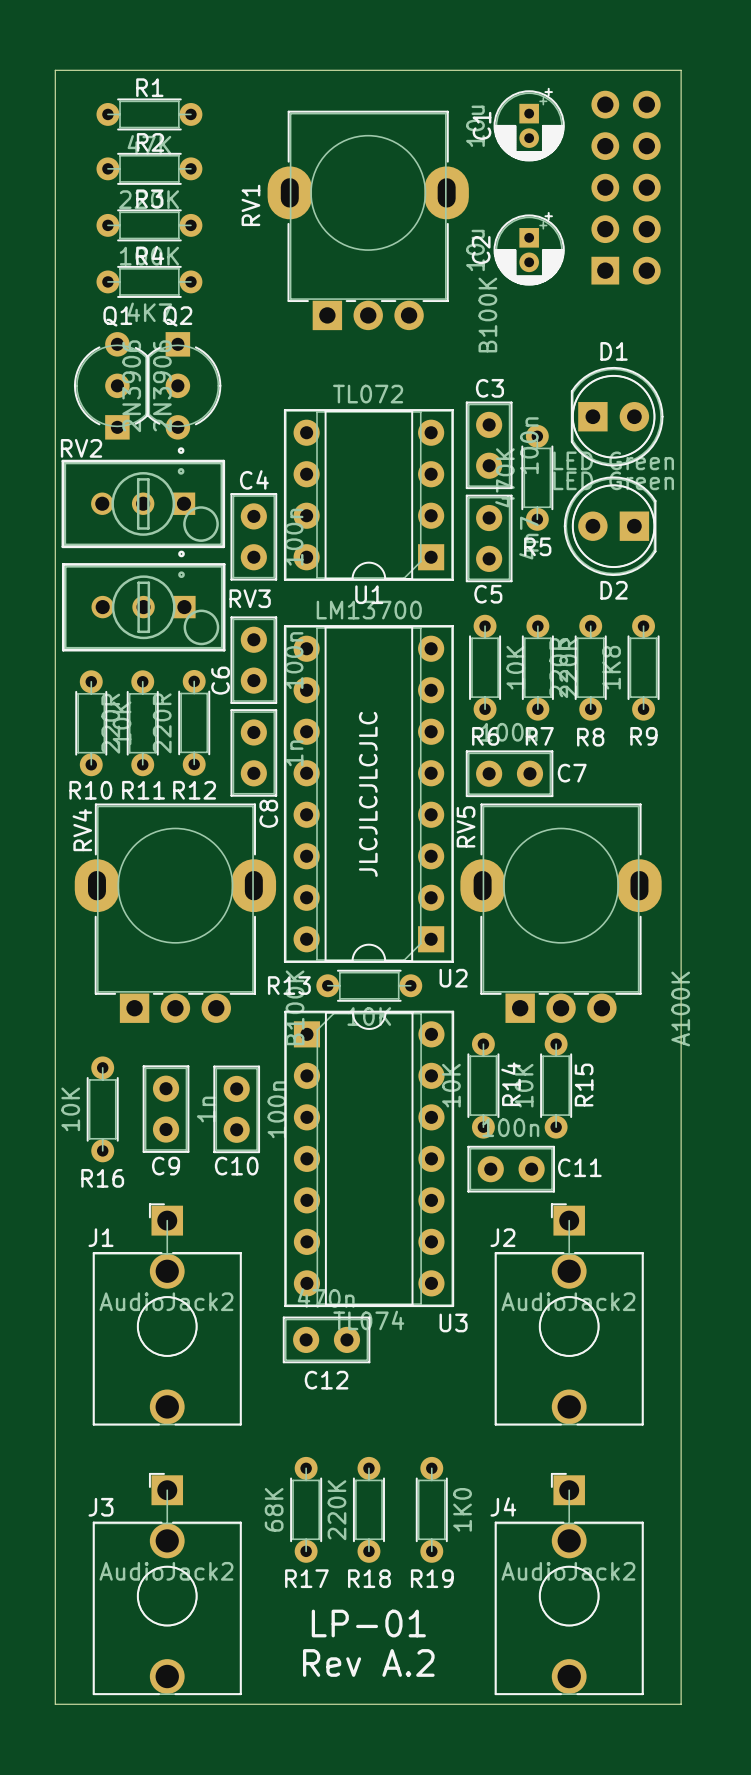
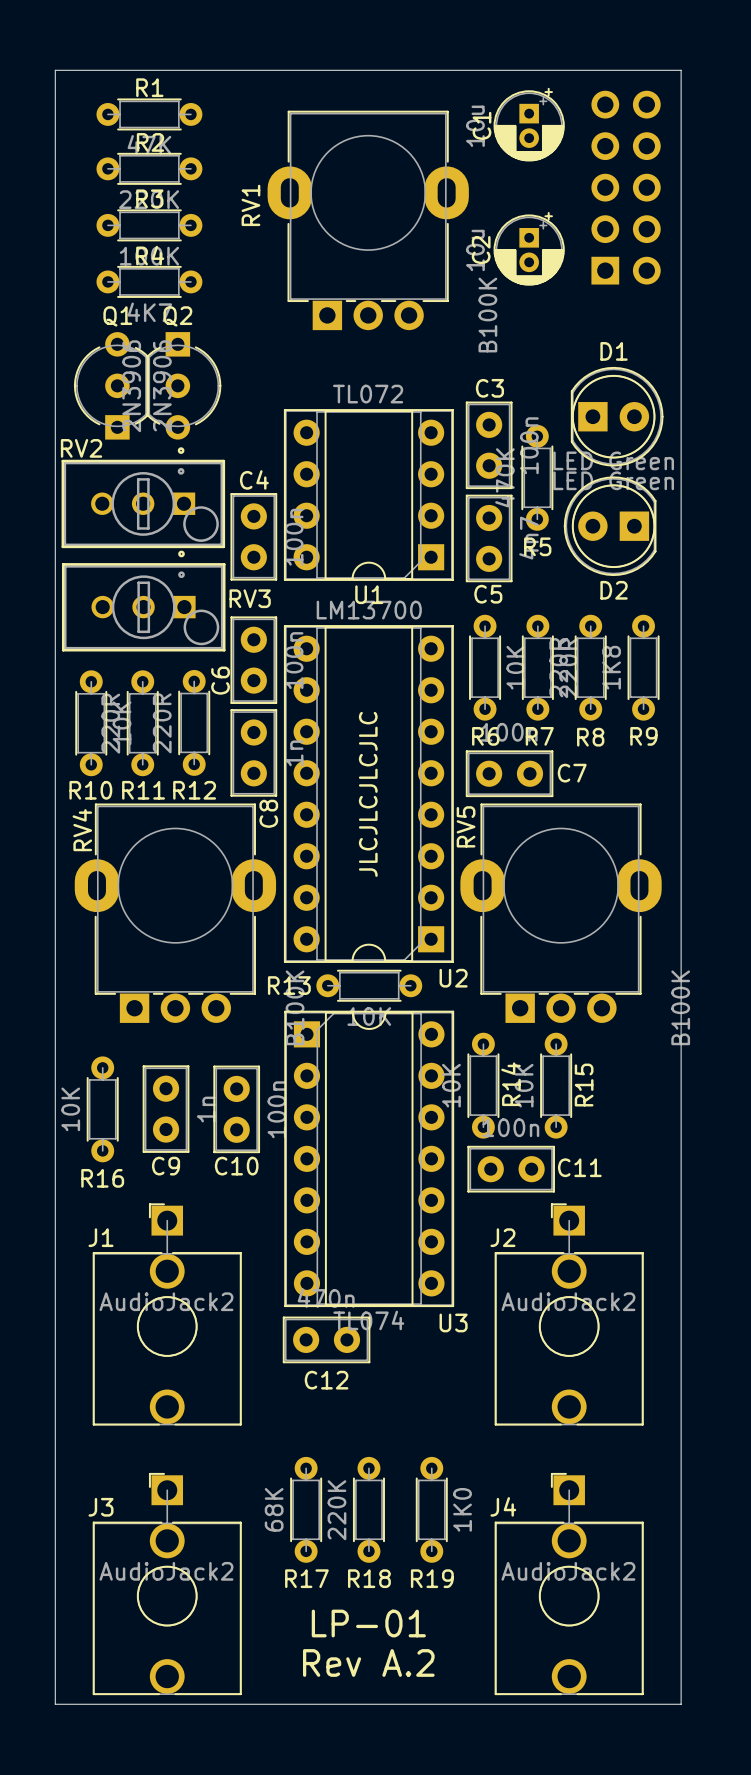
RV5 value: A100K (680, 1009) -> B100K (680, 1007)

